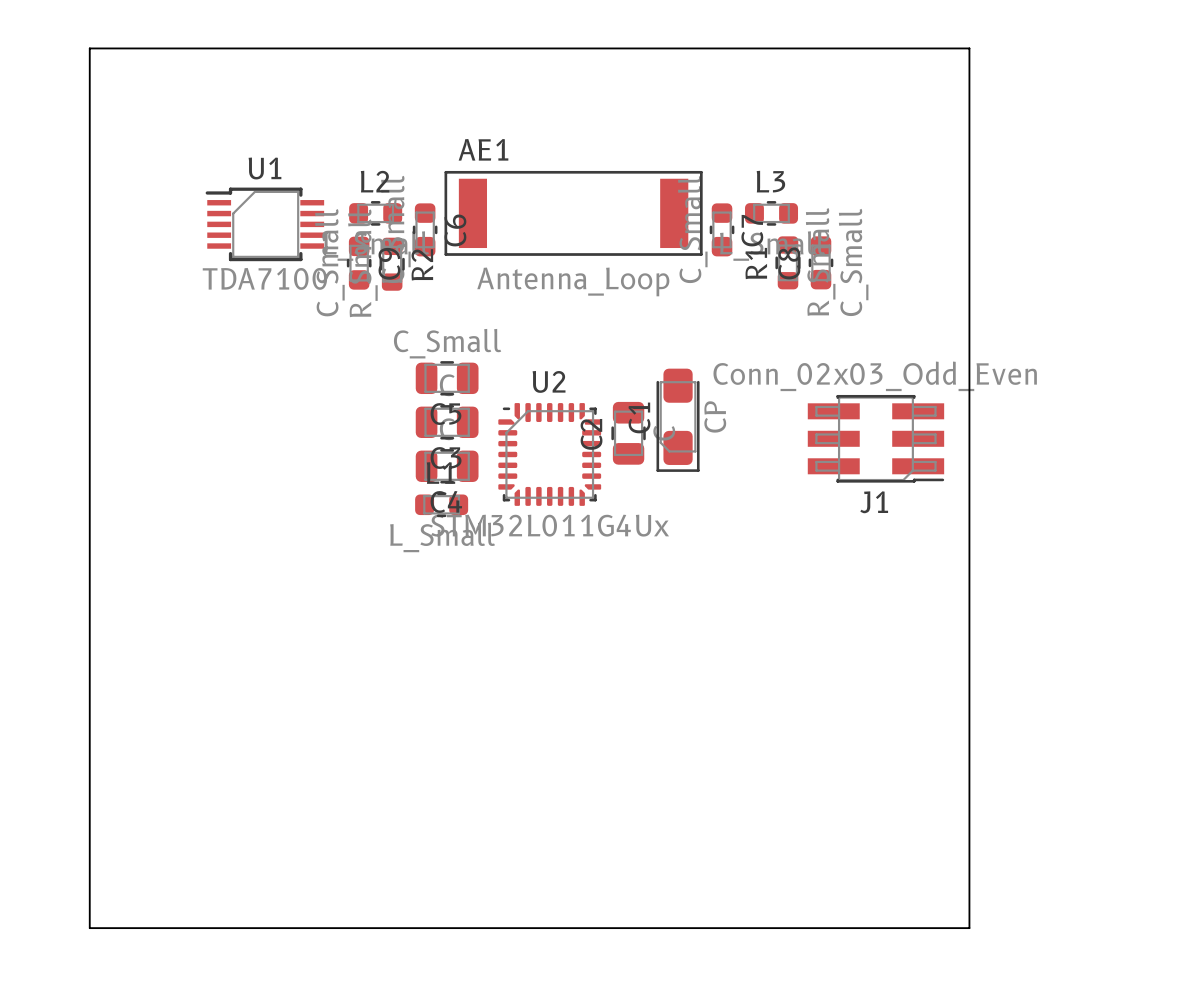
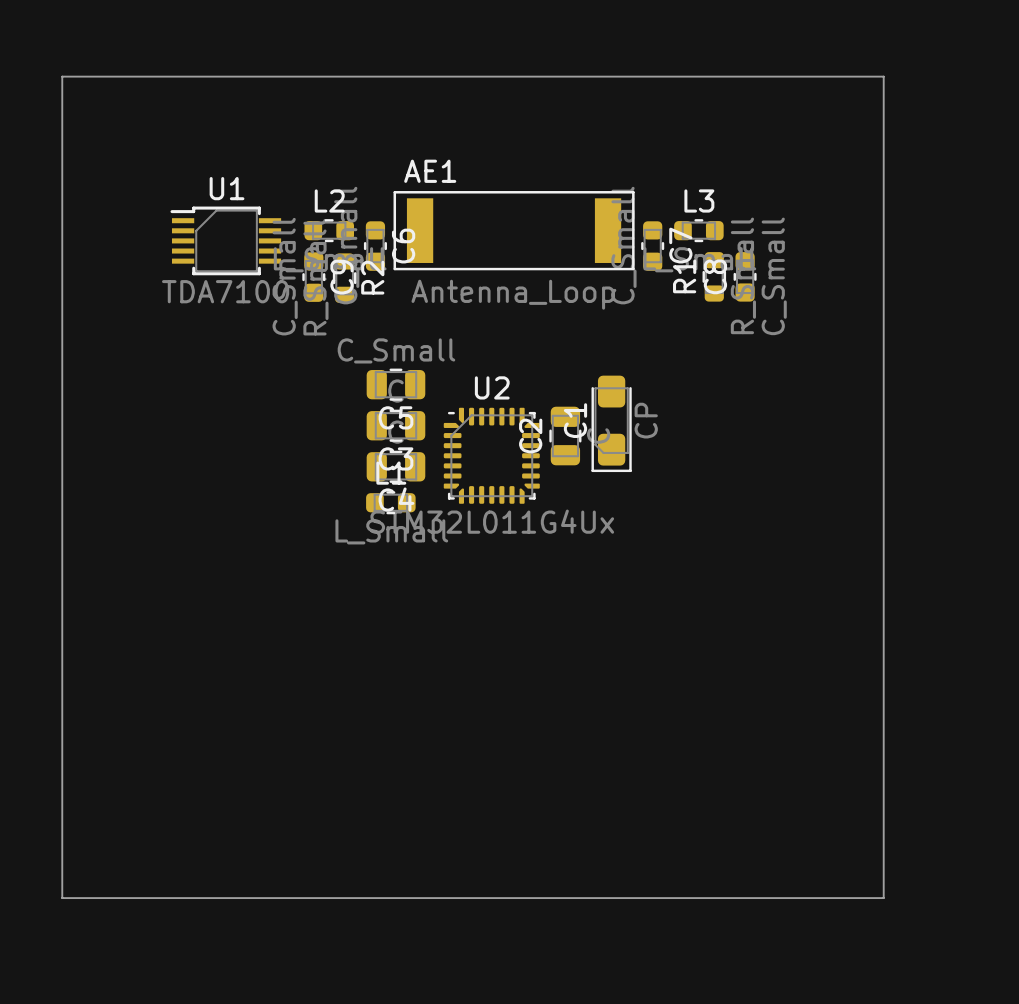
J1: Conn_02x03_Odd_Even (875, 438) -> none

